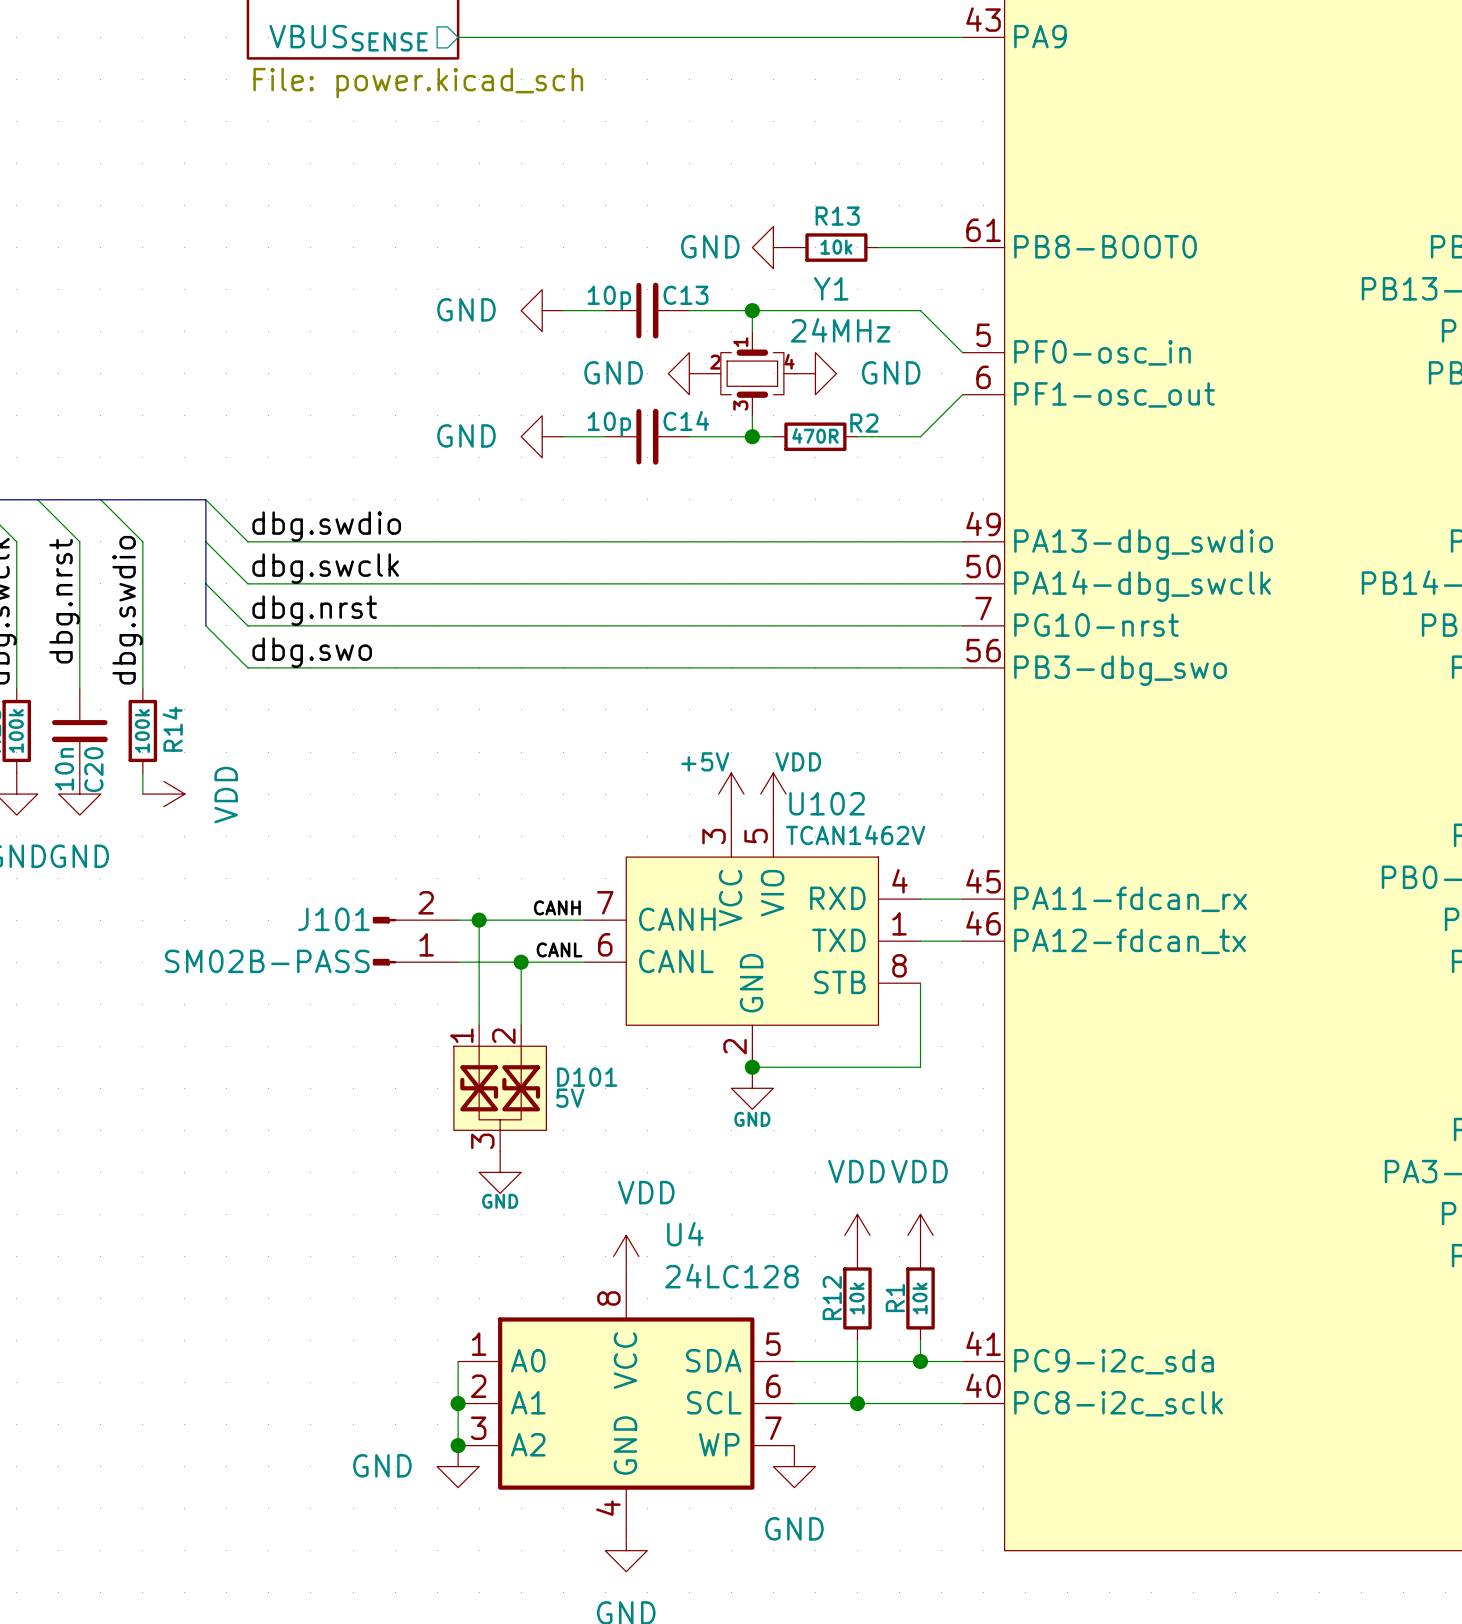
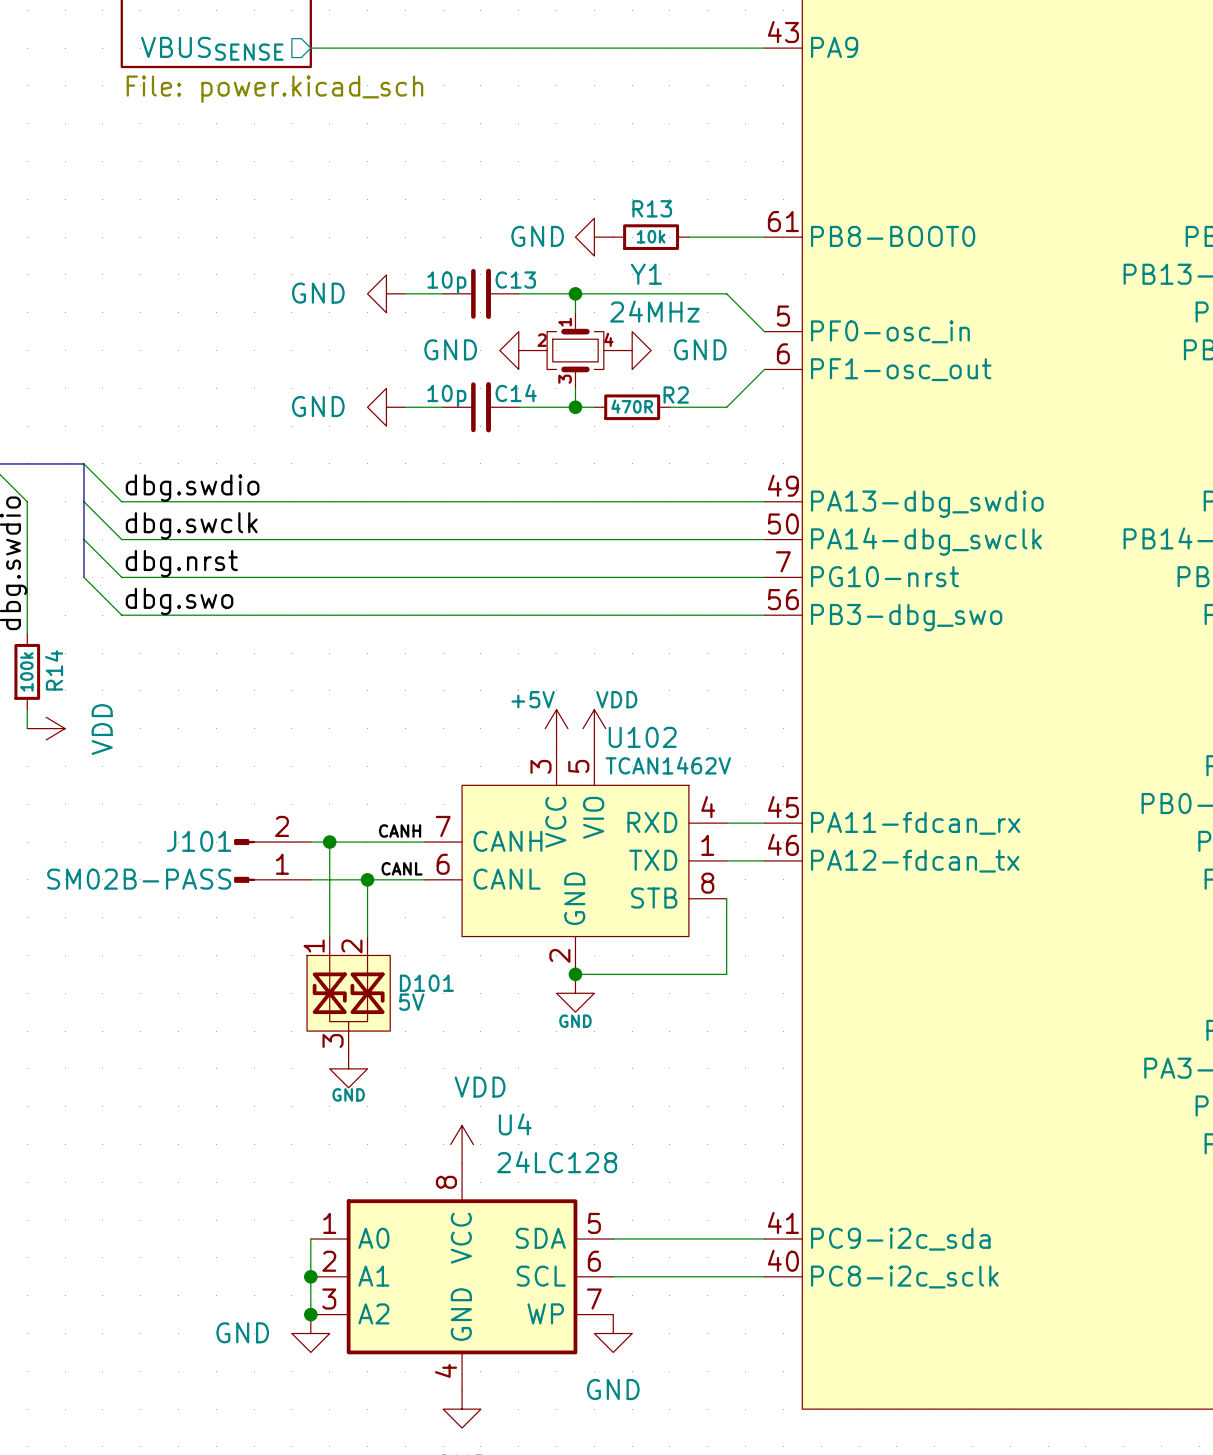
power symbol: VDD (857, 1235) -> none
power symbol: VDD (920, 1235) -> none
R12: 10k (857, 1298) -> none
R1: 10k (920, 1298) -> none
wire: (857, 1340) (857, 1403) -> none
wire: (920, 1340) (920, 1361) -> none
junction: (920, 1361) -> none
junction: (857, 1403) -> none

